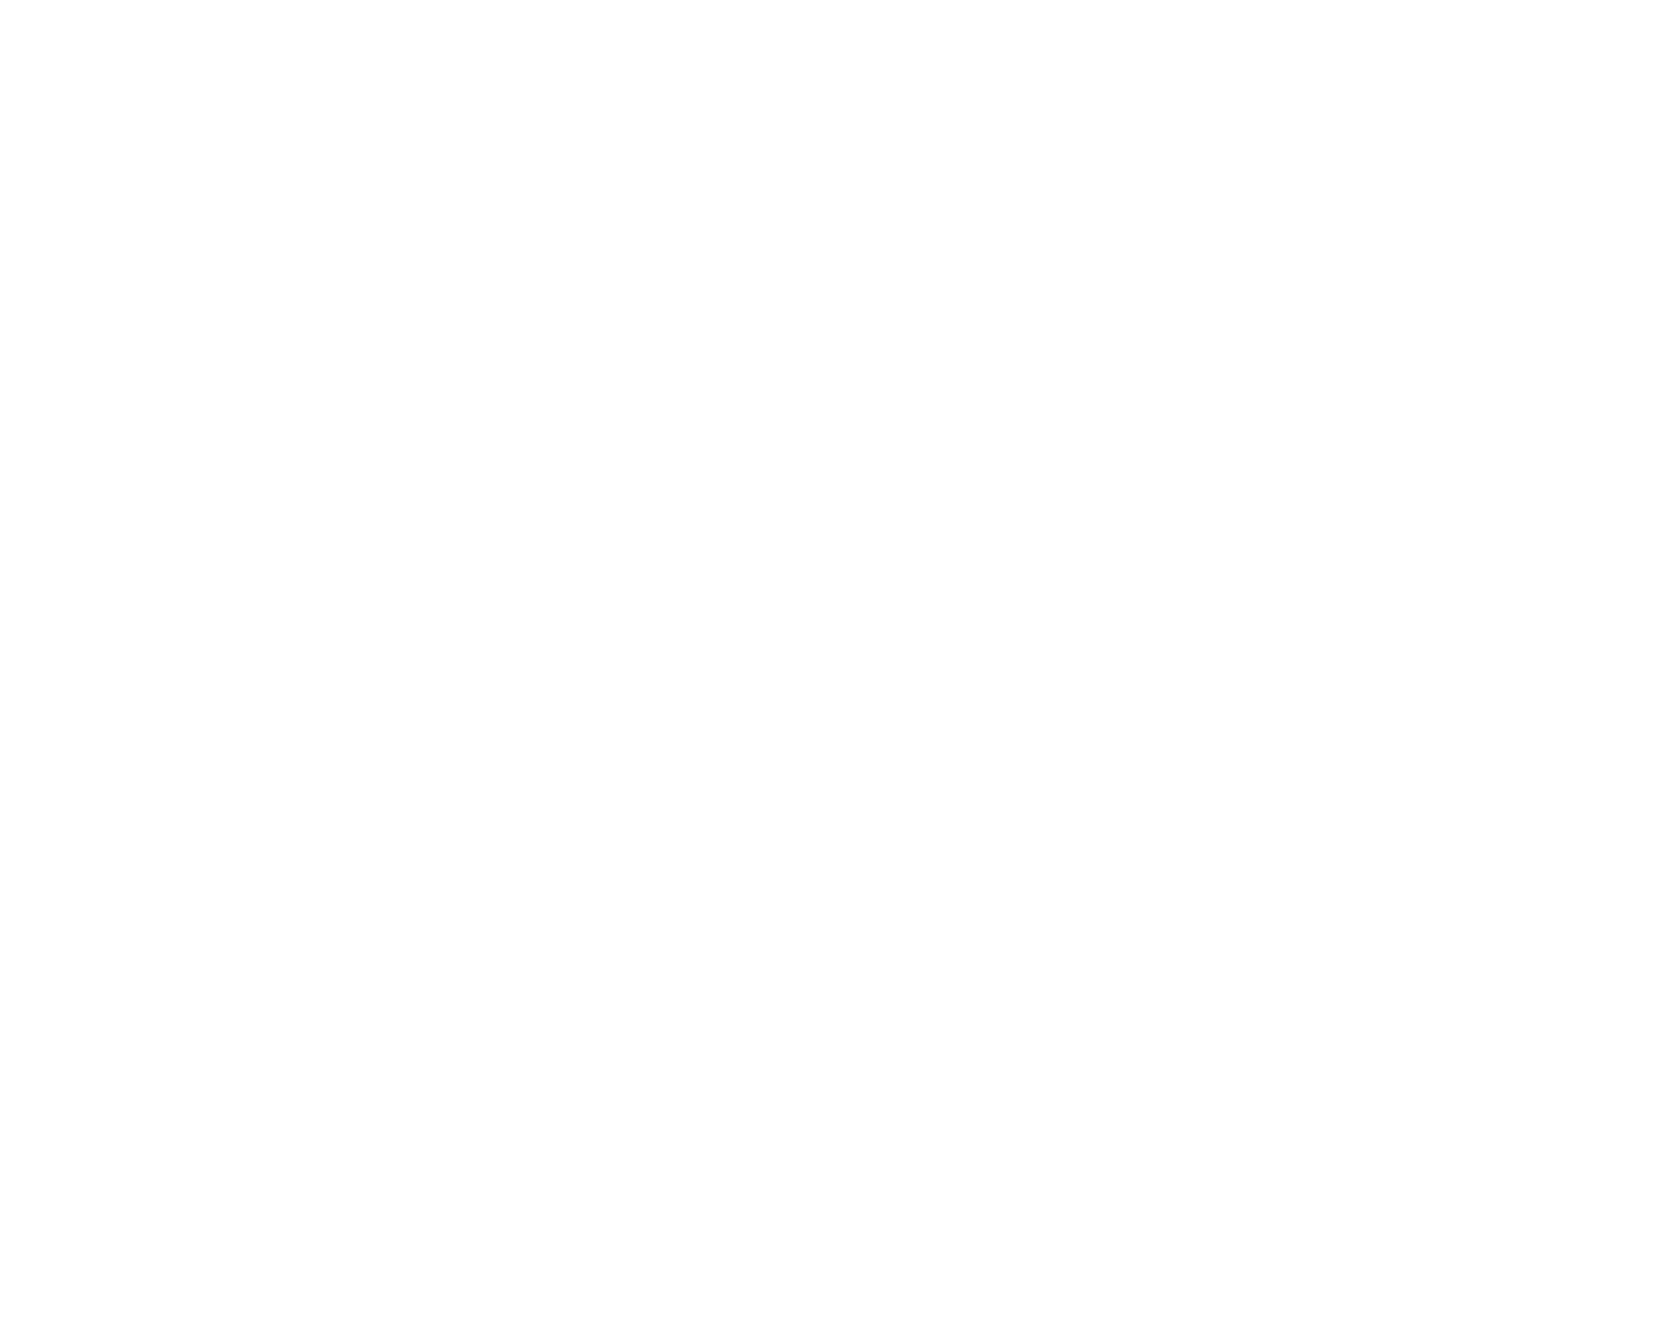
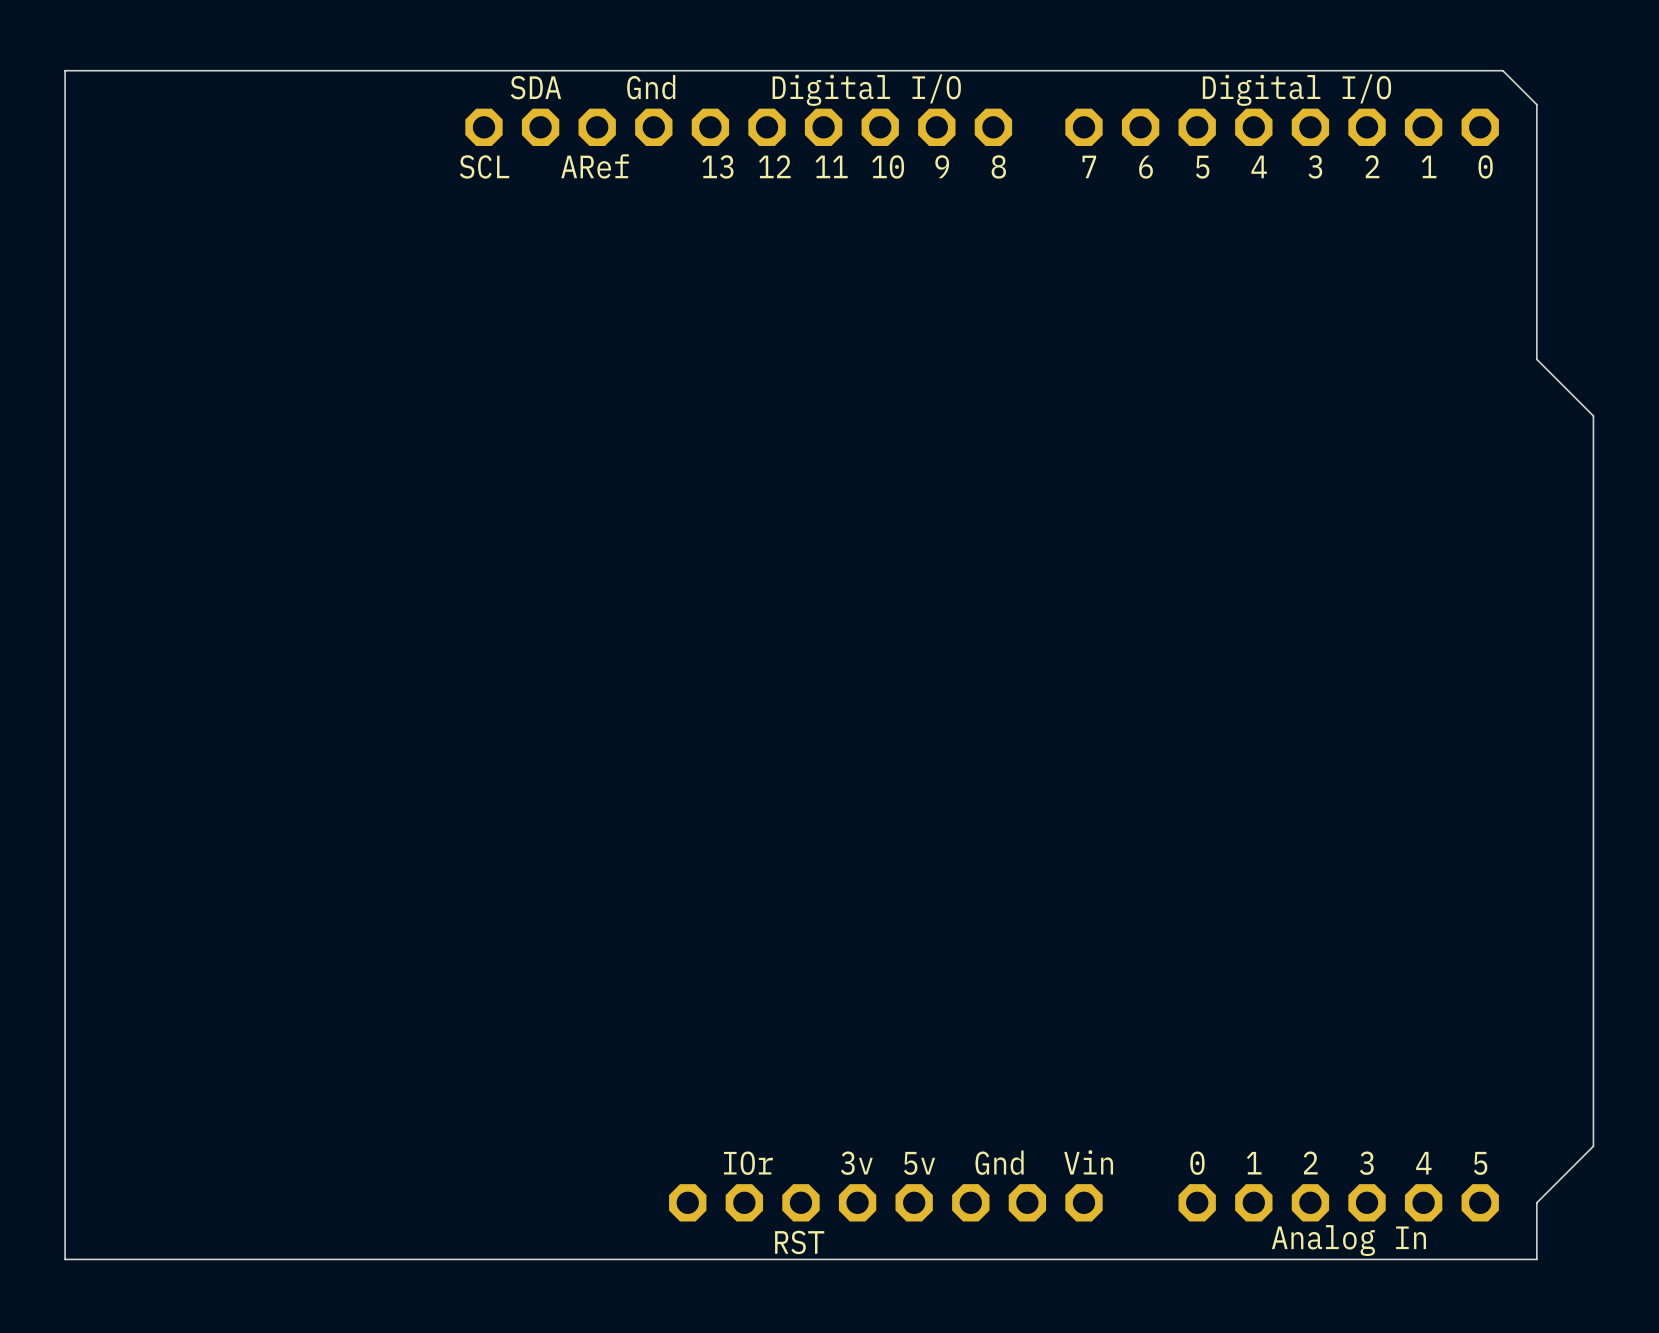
part: none -> (829, 665)

